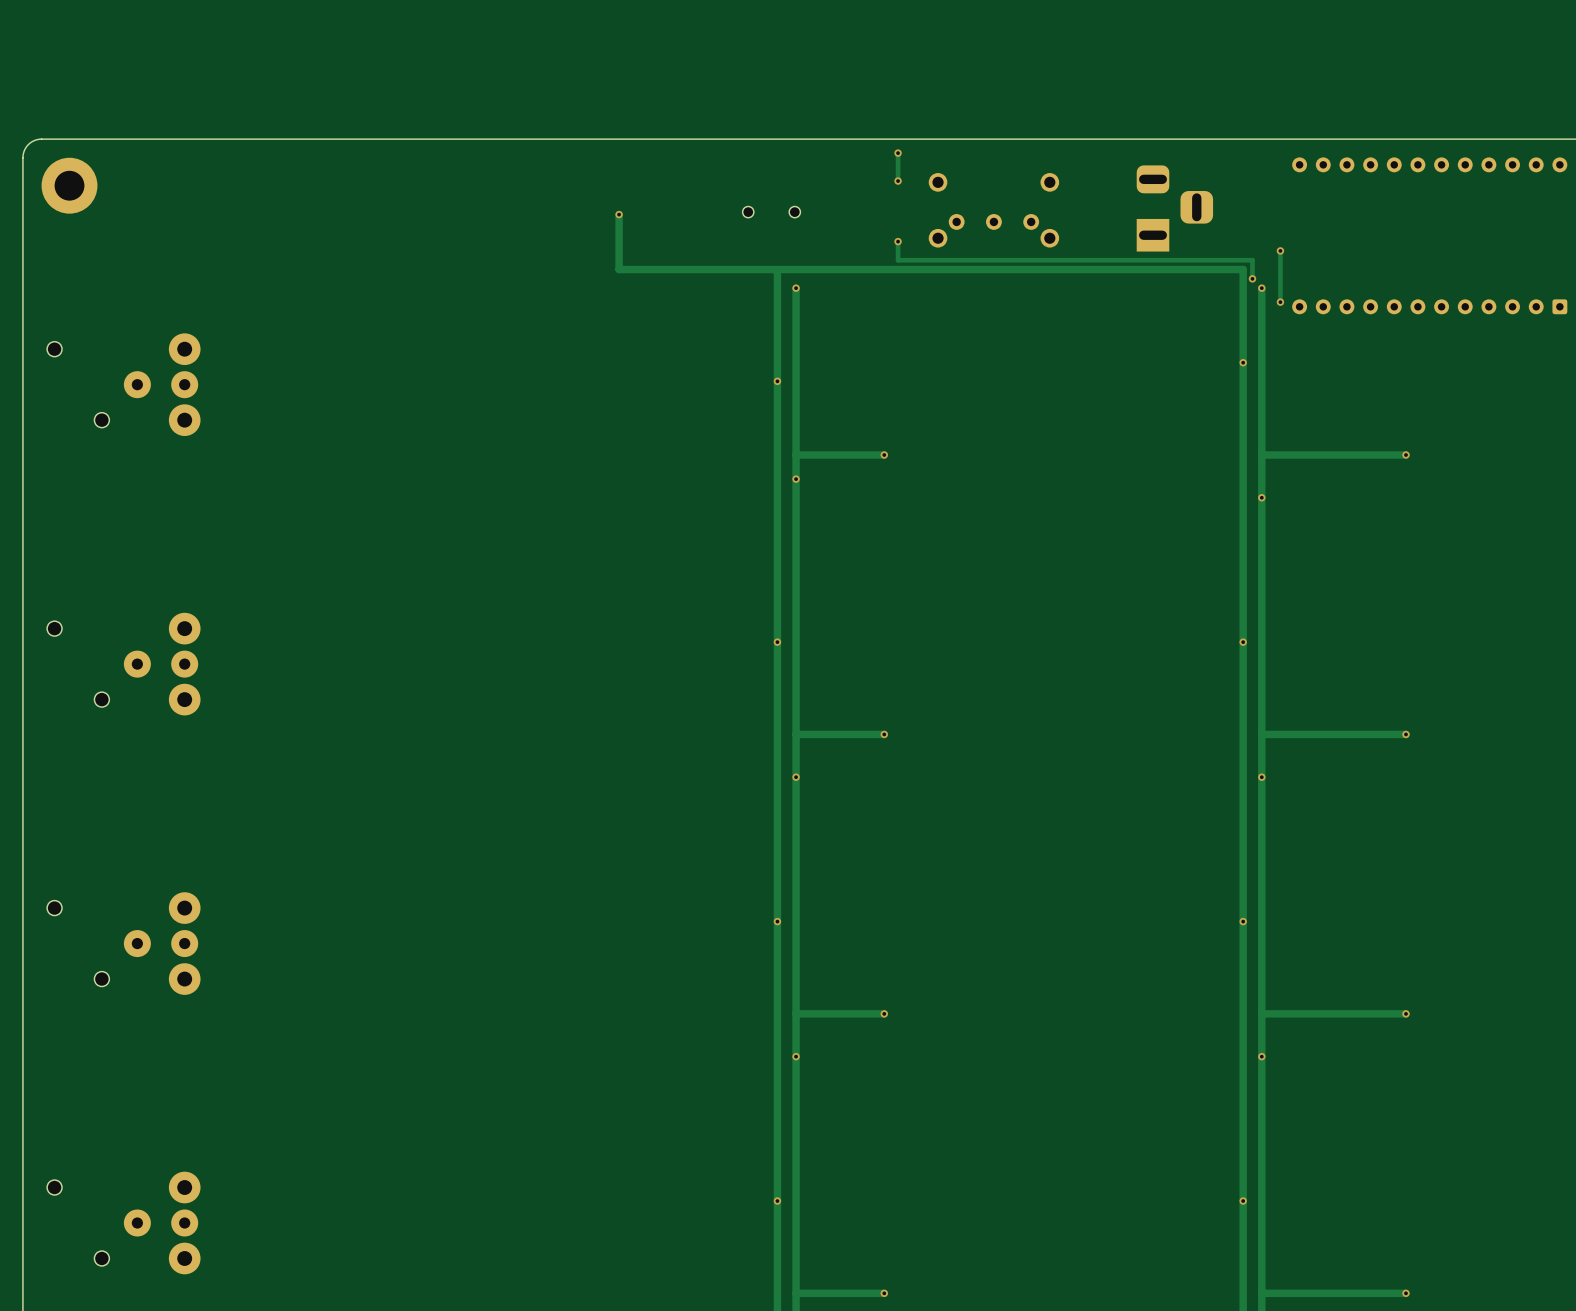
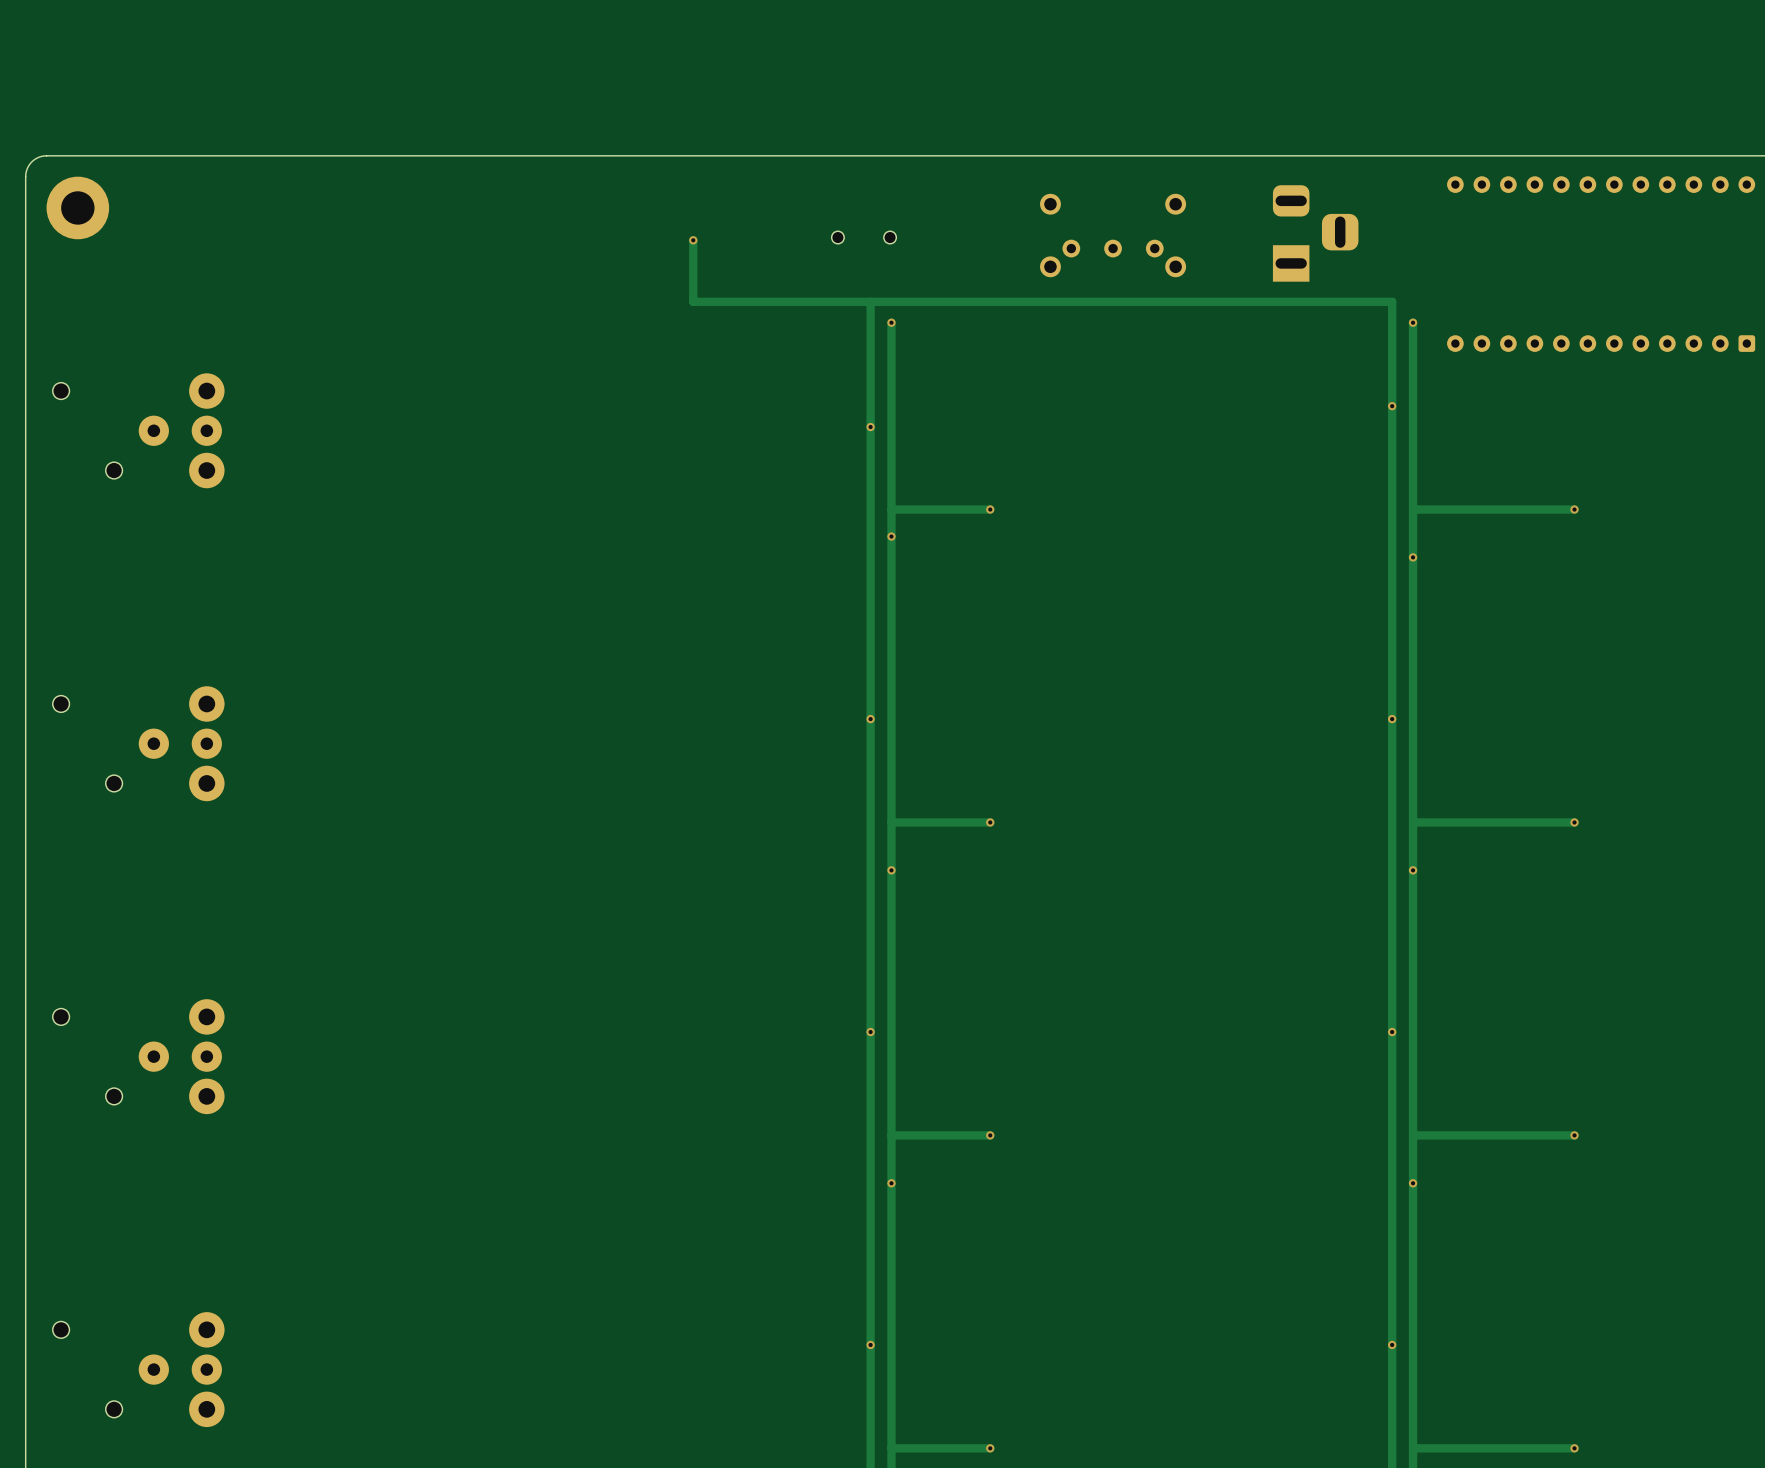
track: (898, 153) (898, 181) -> none
via: (898, 153) -> none
via: (898, 181) -> none
track: (898, 241) (898, 260) (1252, 260) (1252, 278) -> none
via: (898, 241) -> none
track: (1280, 250) (1280, 302) -> none
via: (1280, 250) -> none
via: (1252, 278) -> none
via: (1280, 302) -> none

